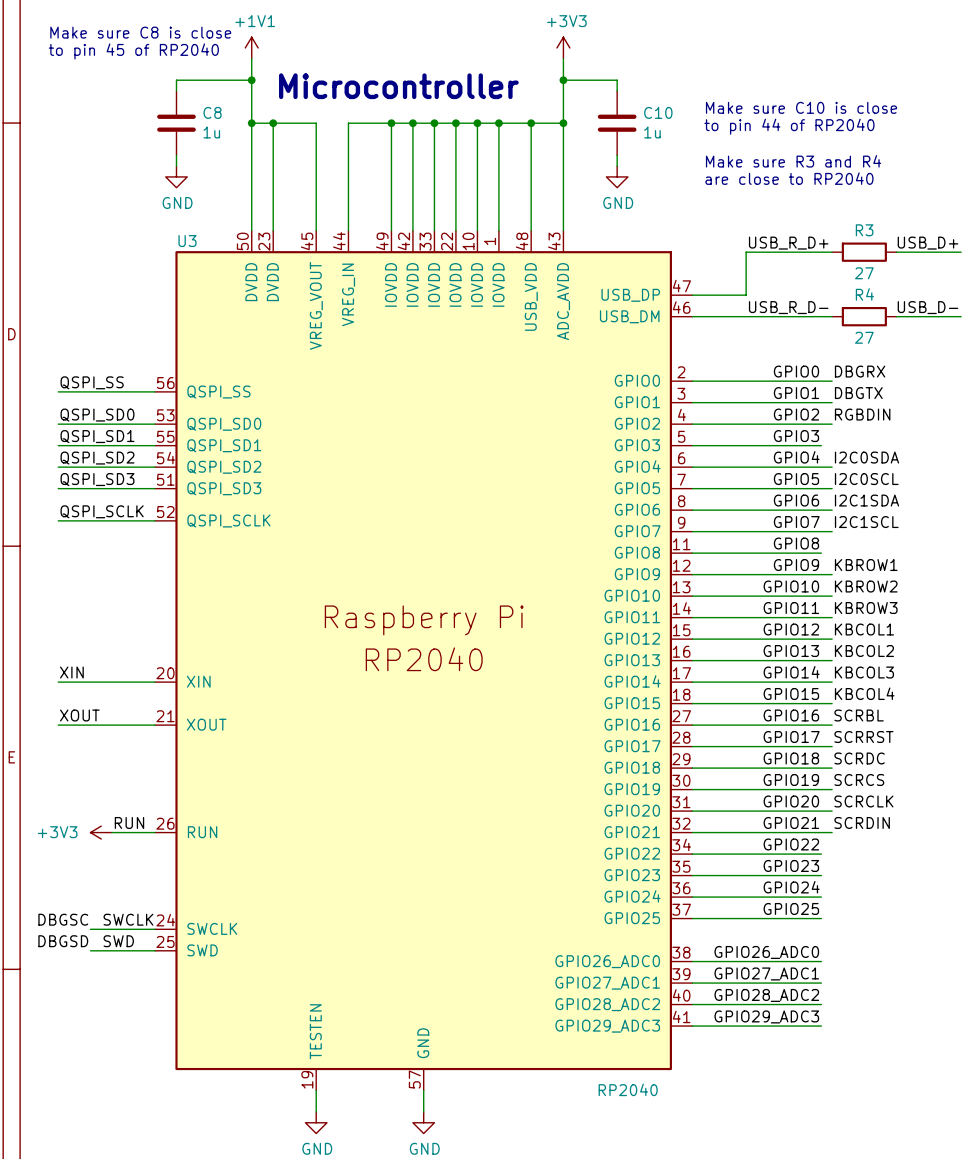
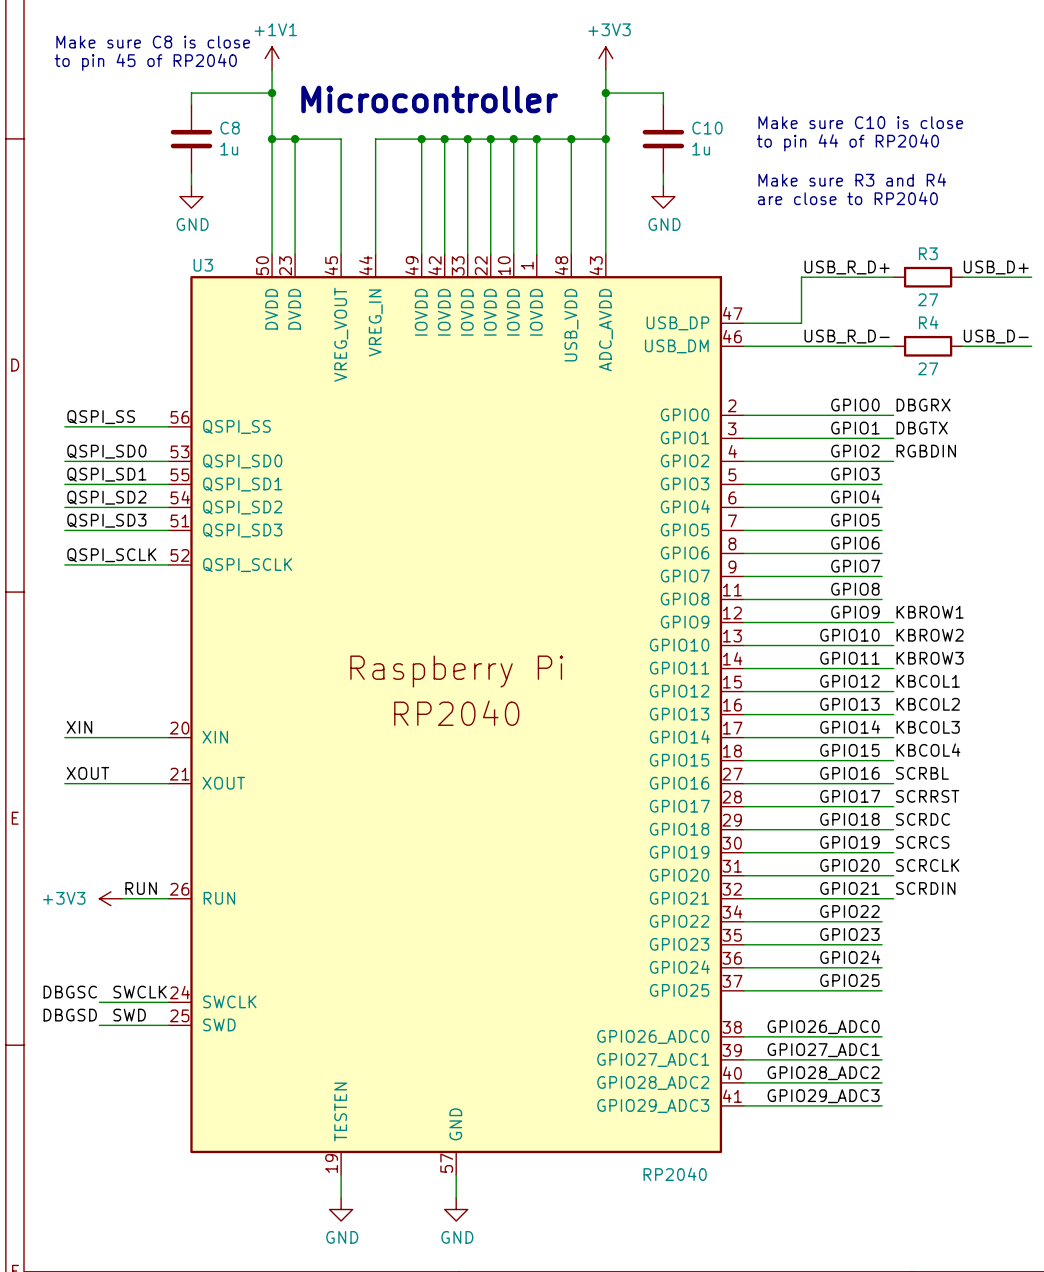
label: I2C0SDA (867, 457) -> none
wire: (821, 467) (832, 467) -> none
label: I2C0SCL (866, 479) -> none
wire: (821, 488) (832, 488) -> none
label: I2C1SDA (867, 500) -> none
wire: (821, 510) (832, 510) -> none
label: I2C1SCL (866, 522) -> none
wire: (821, 531) (832, 531) -> none

